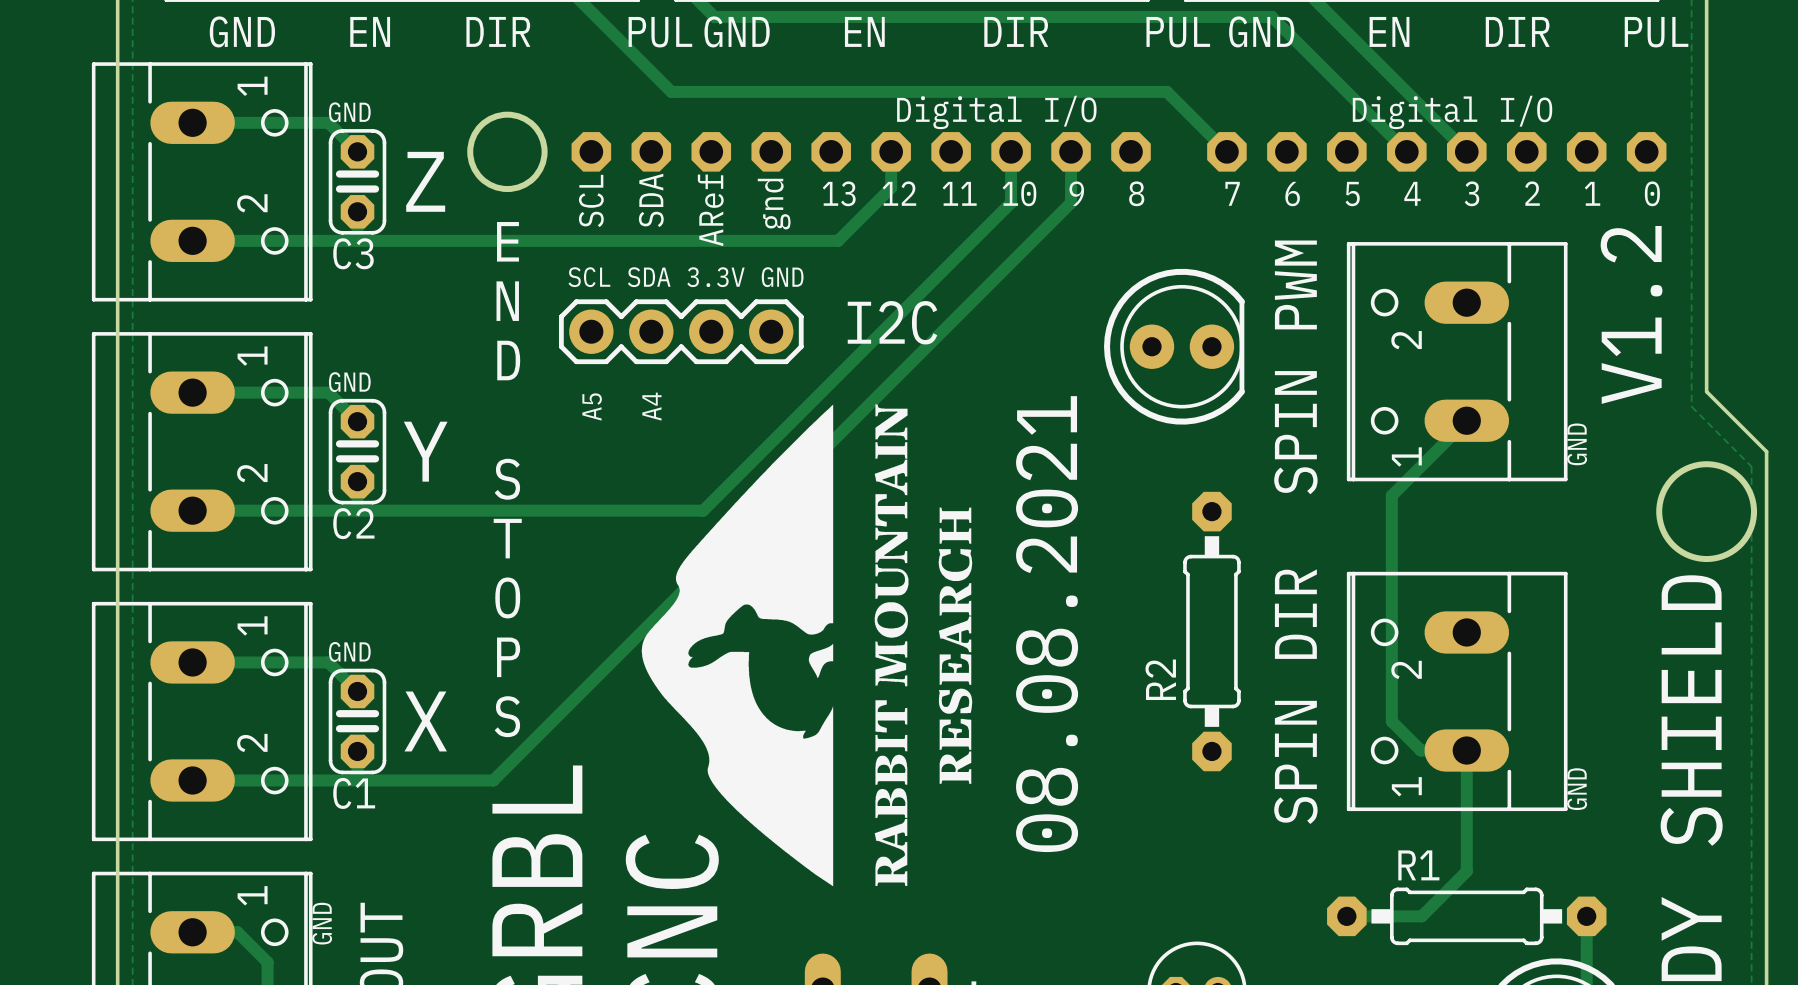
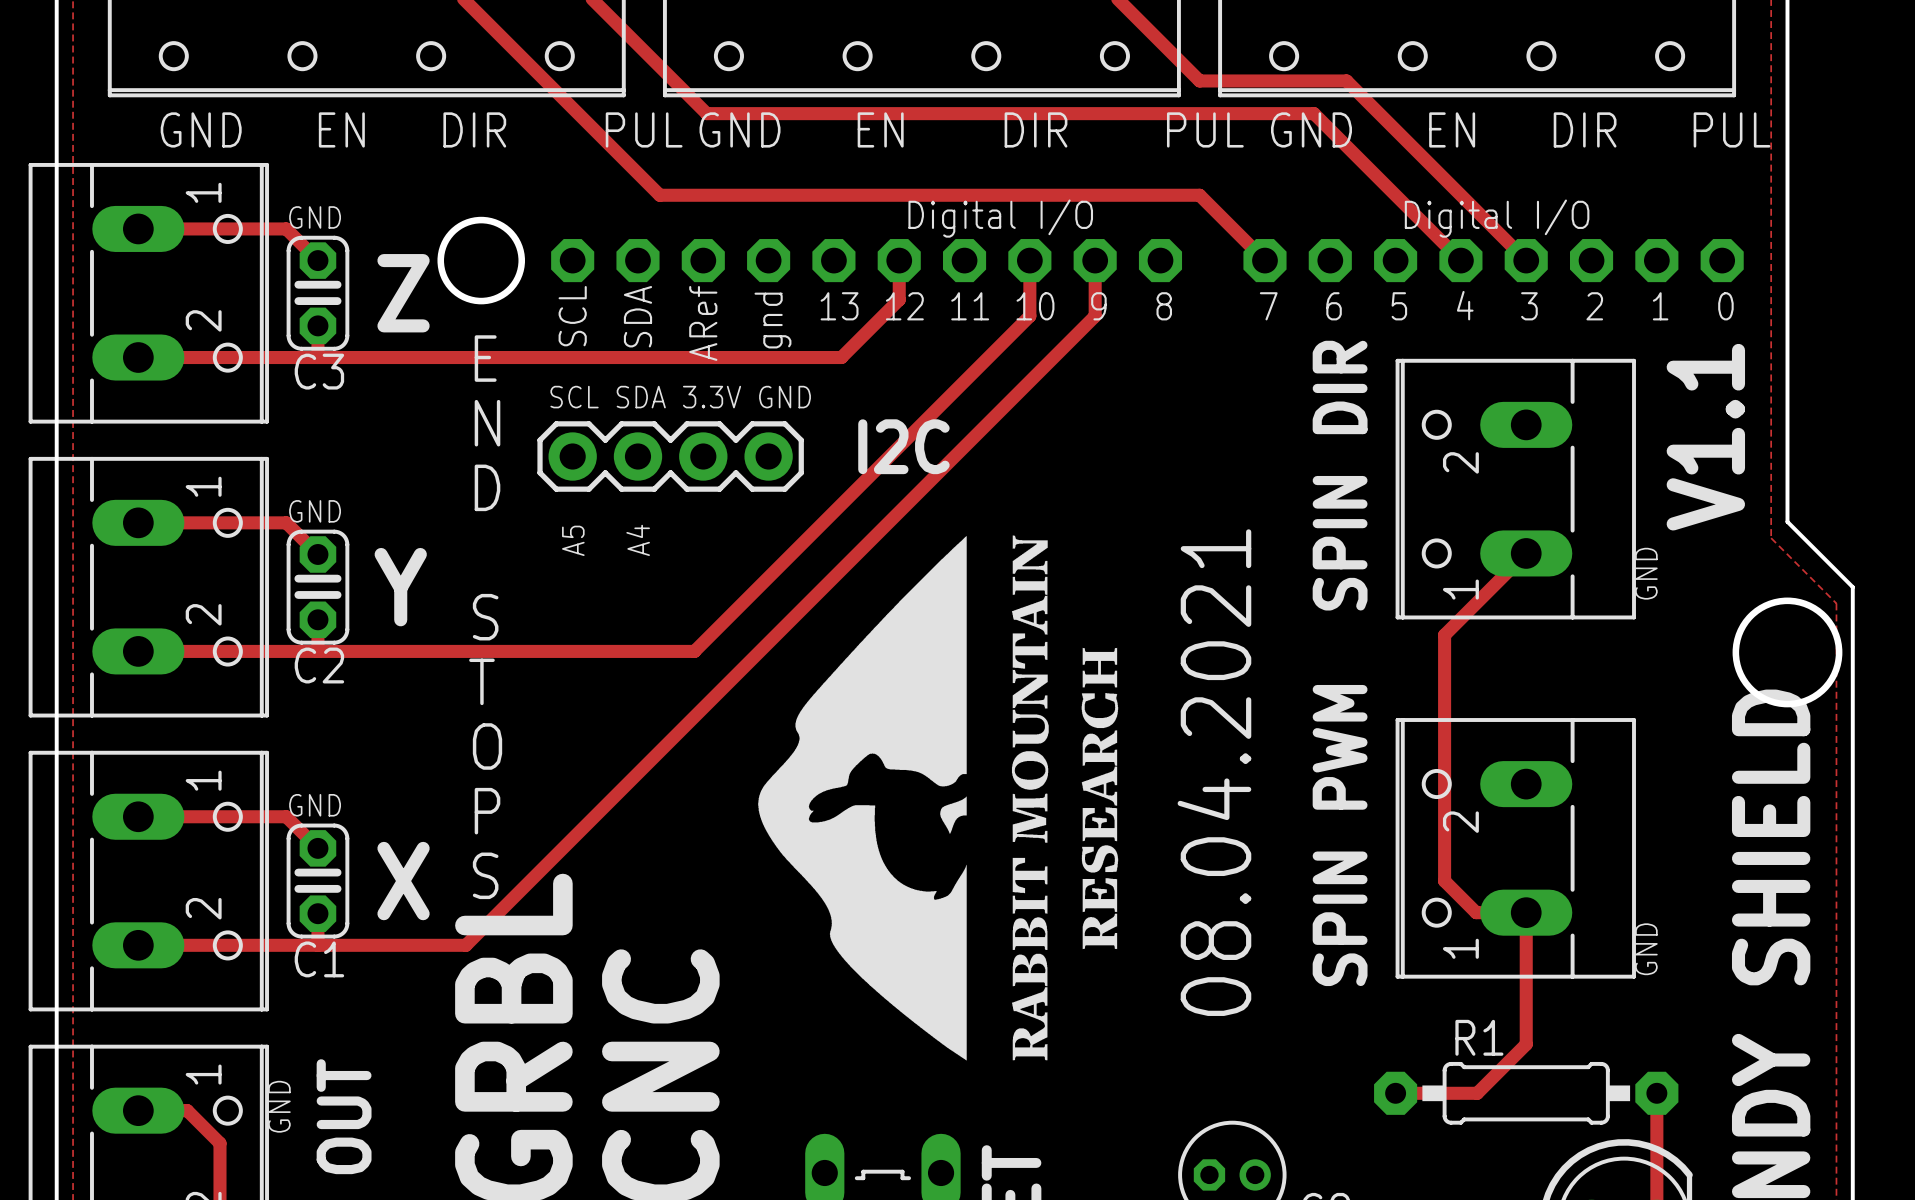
text: V1.2 (1631, 314) -> V1.1 (1705, 437)
part: (1174, 346) -> none
text: SPIN PWM (1295, 367) -> SPIN DIR (1340, 475)
text: 08.08.2021 (1047, 624) -> none
text: none -> 08.04.2021 (1214, 772)
R2: (1211, 631) -> none
drawing position: (806, 645) -> (938, 797)
text: SPIN DIR (1295, 696) -> SPIN PWM (1340, 835)

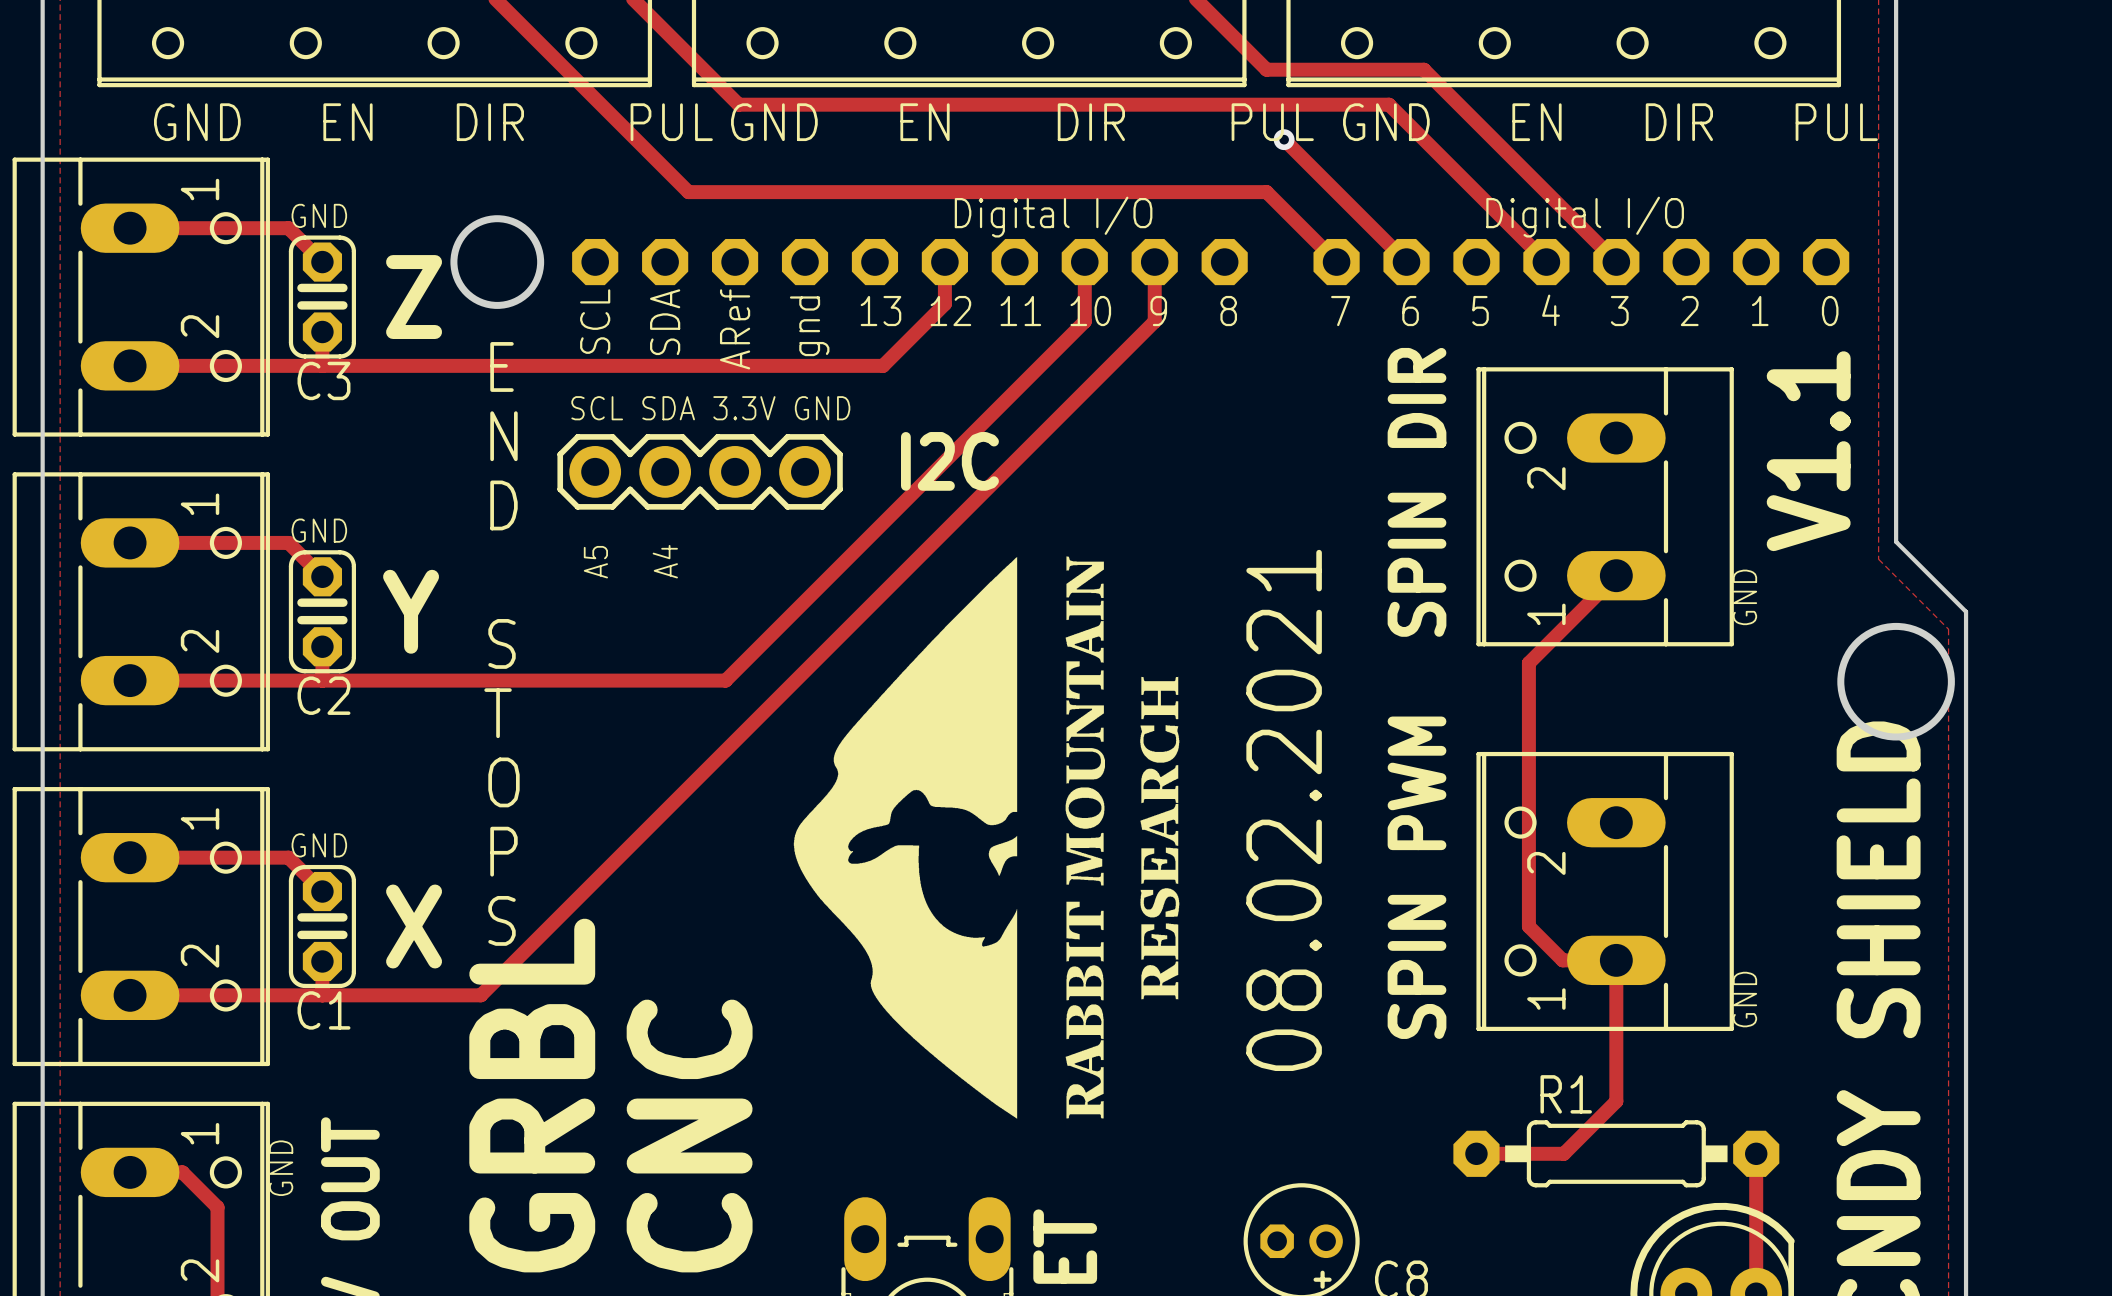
track: none -> (1284, 139) (1406, 262)
via: none -> (1284, 139)
text: 08.04.2021 (1214, 772) -> 08.02.2021 (1284, 810)

